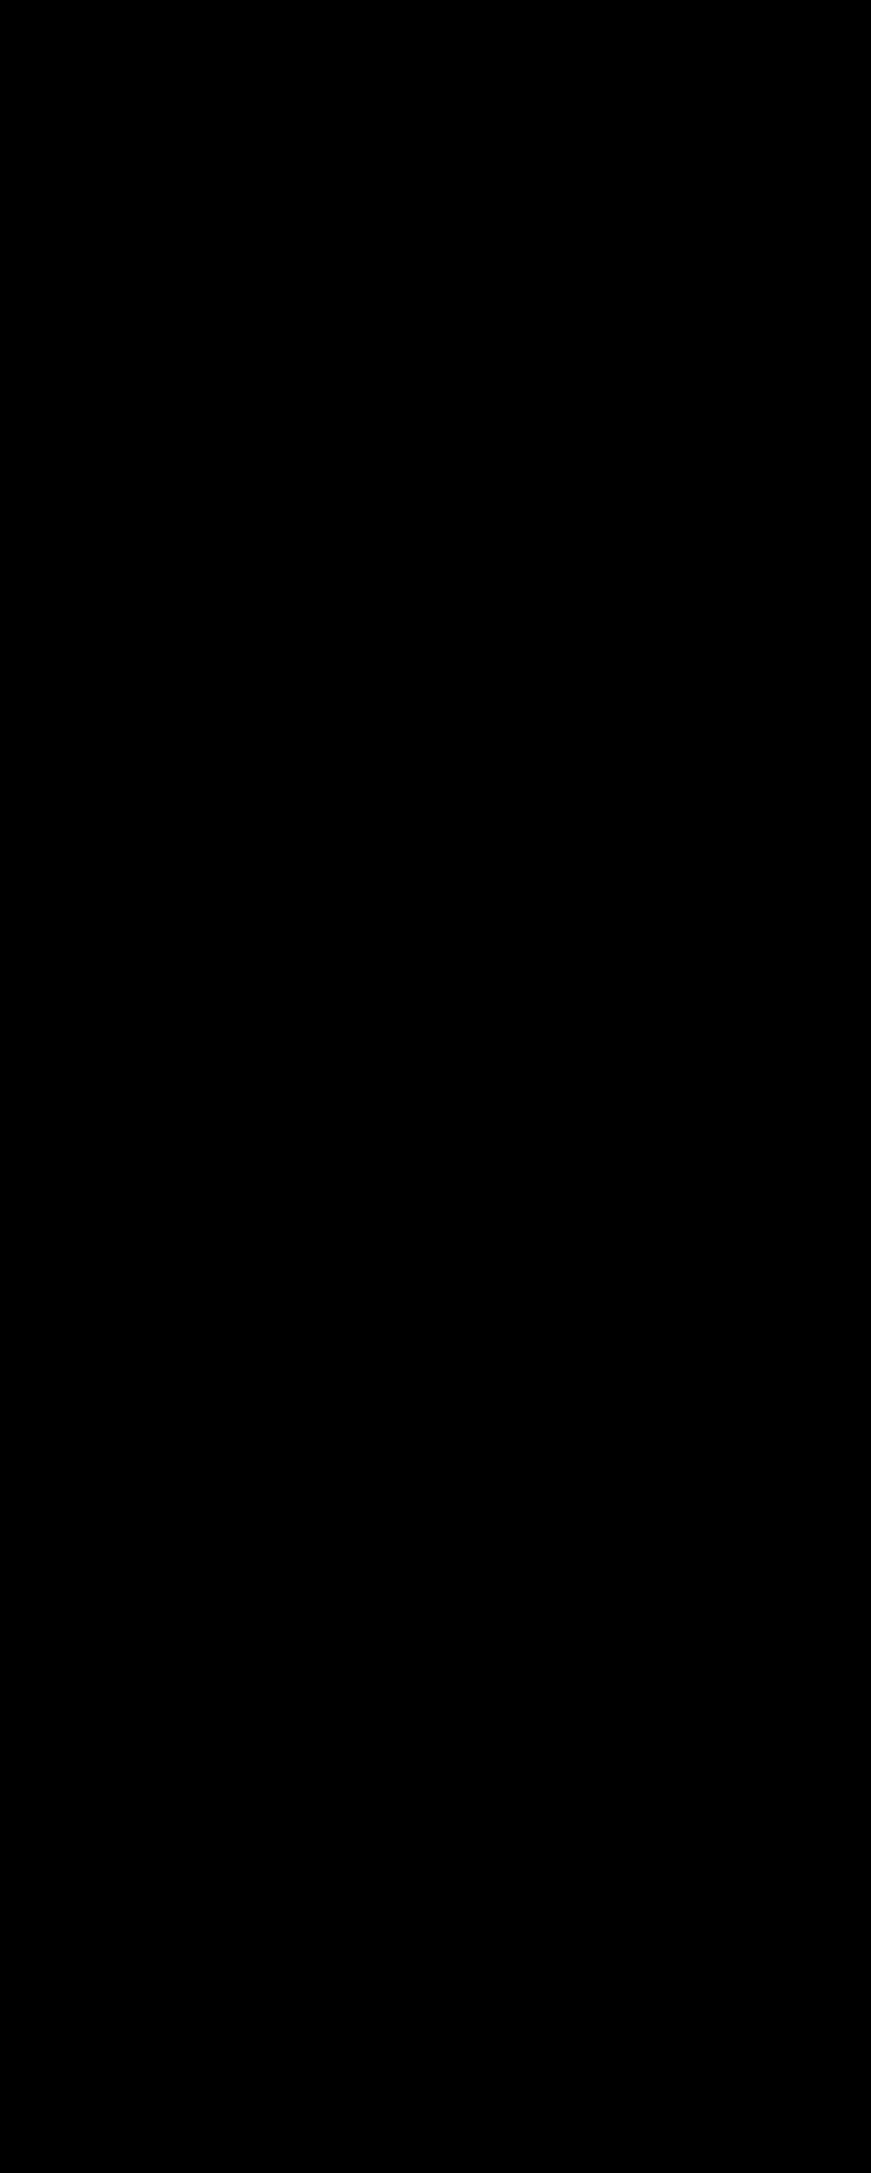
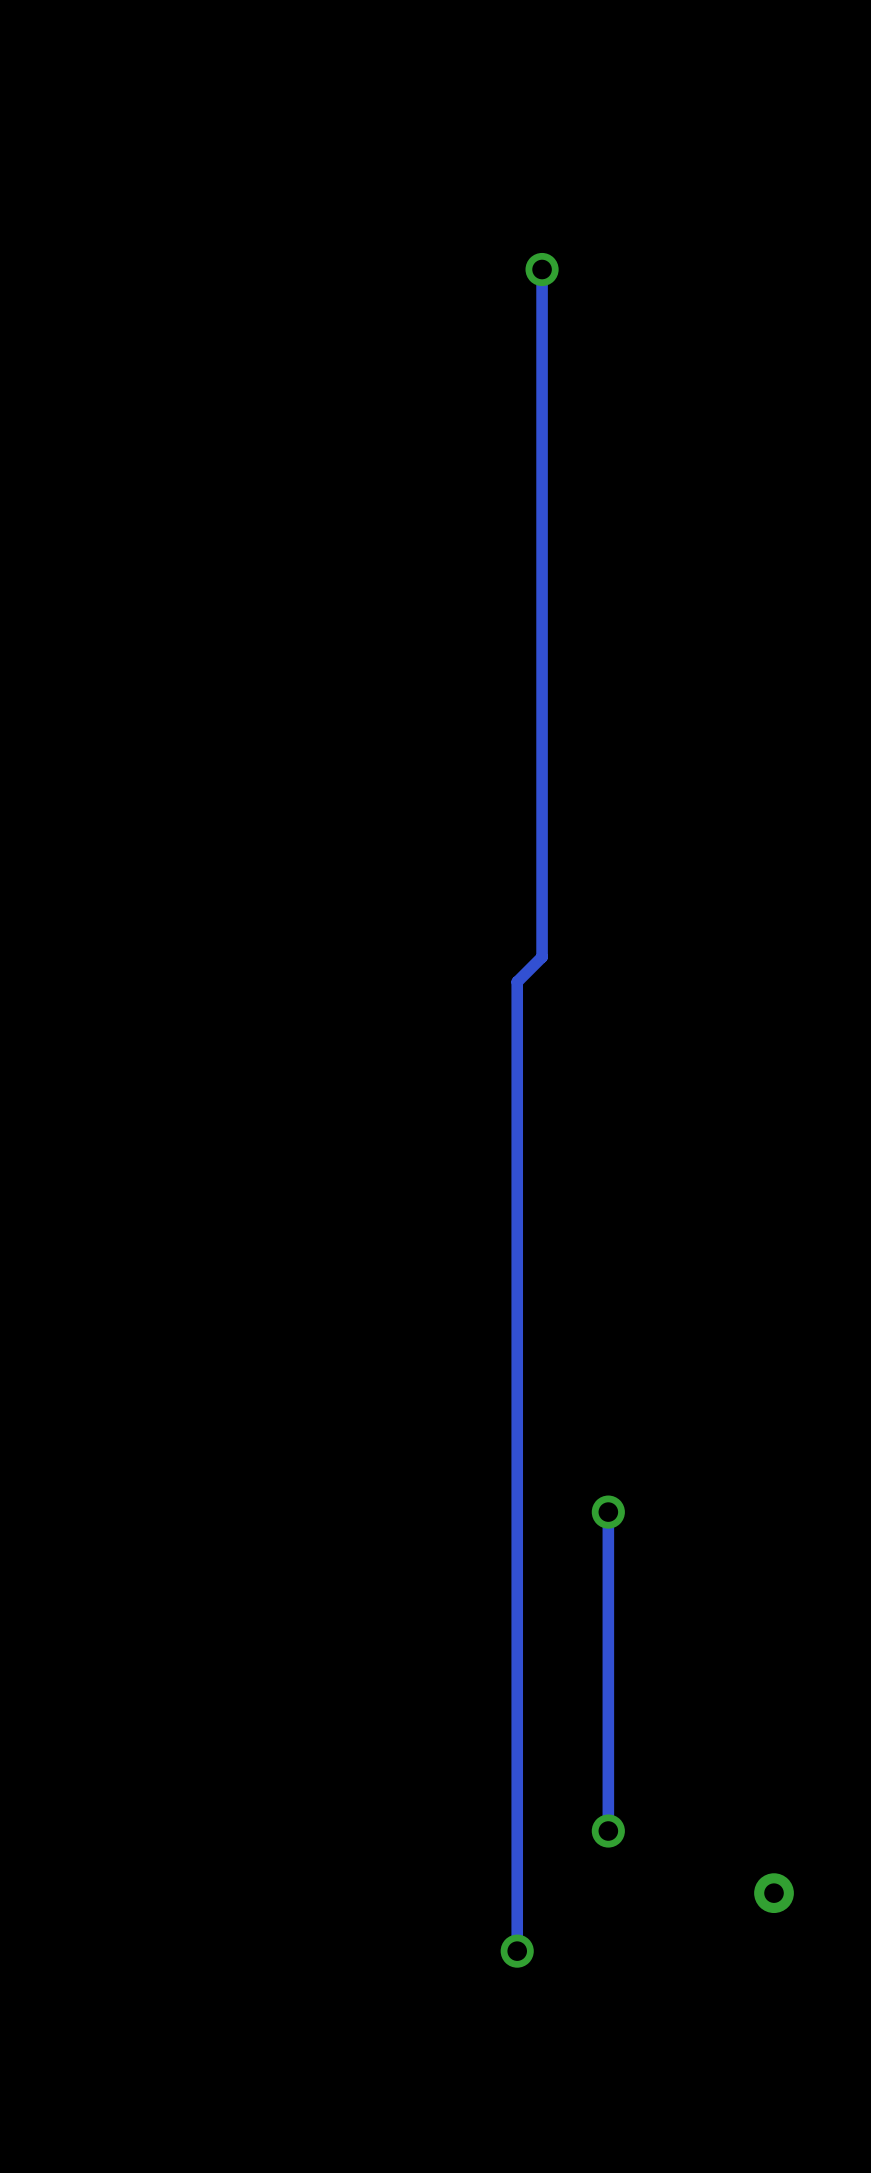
via: none -> (542, 269)
track: none -> (542, 277) (542, 957) (517, 981) (517, 1959)
via: none -> (608, 1512)
track: none -> (608, 1520) (608, 1839)
via: none -> (608, 1831)
via: none -> (774, 1893)
via: none -> (517, 1951)

